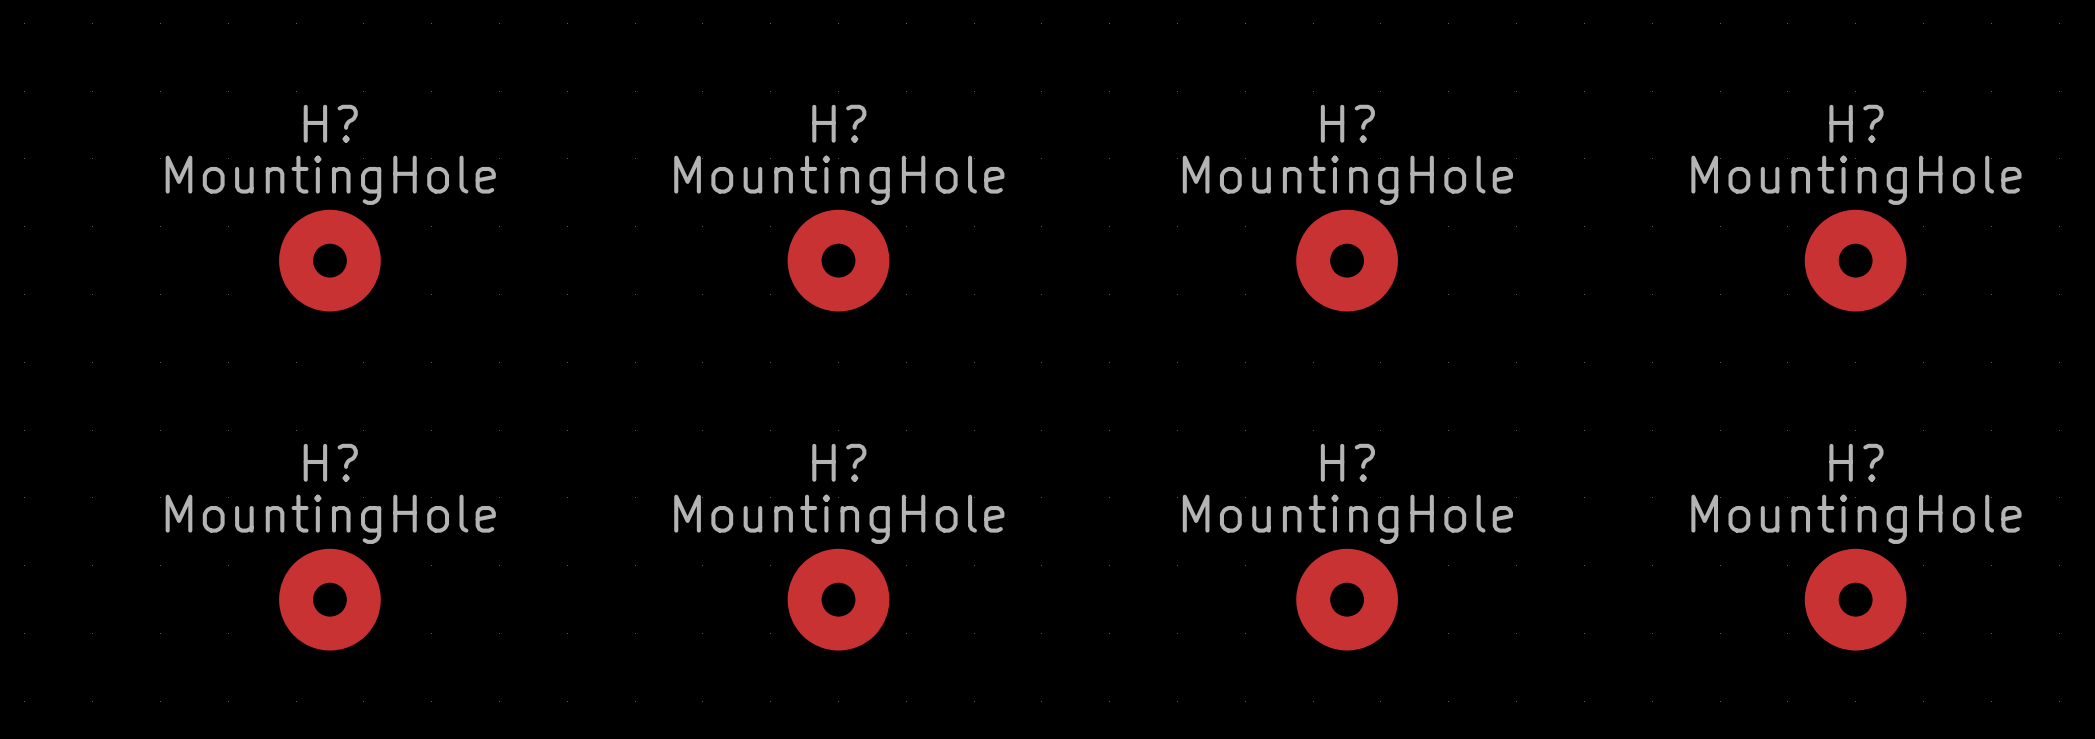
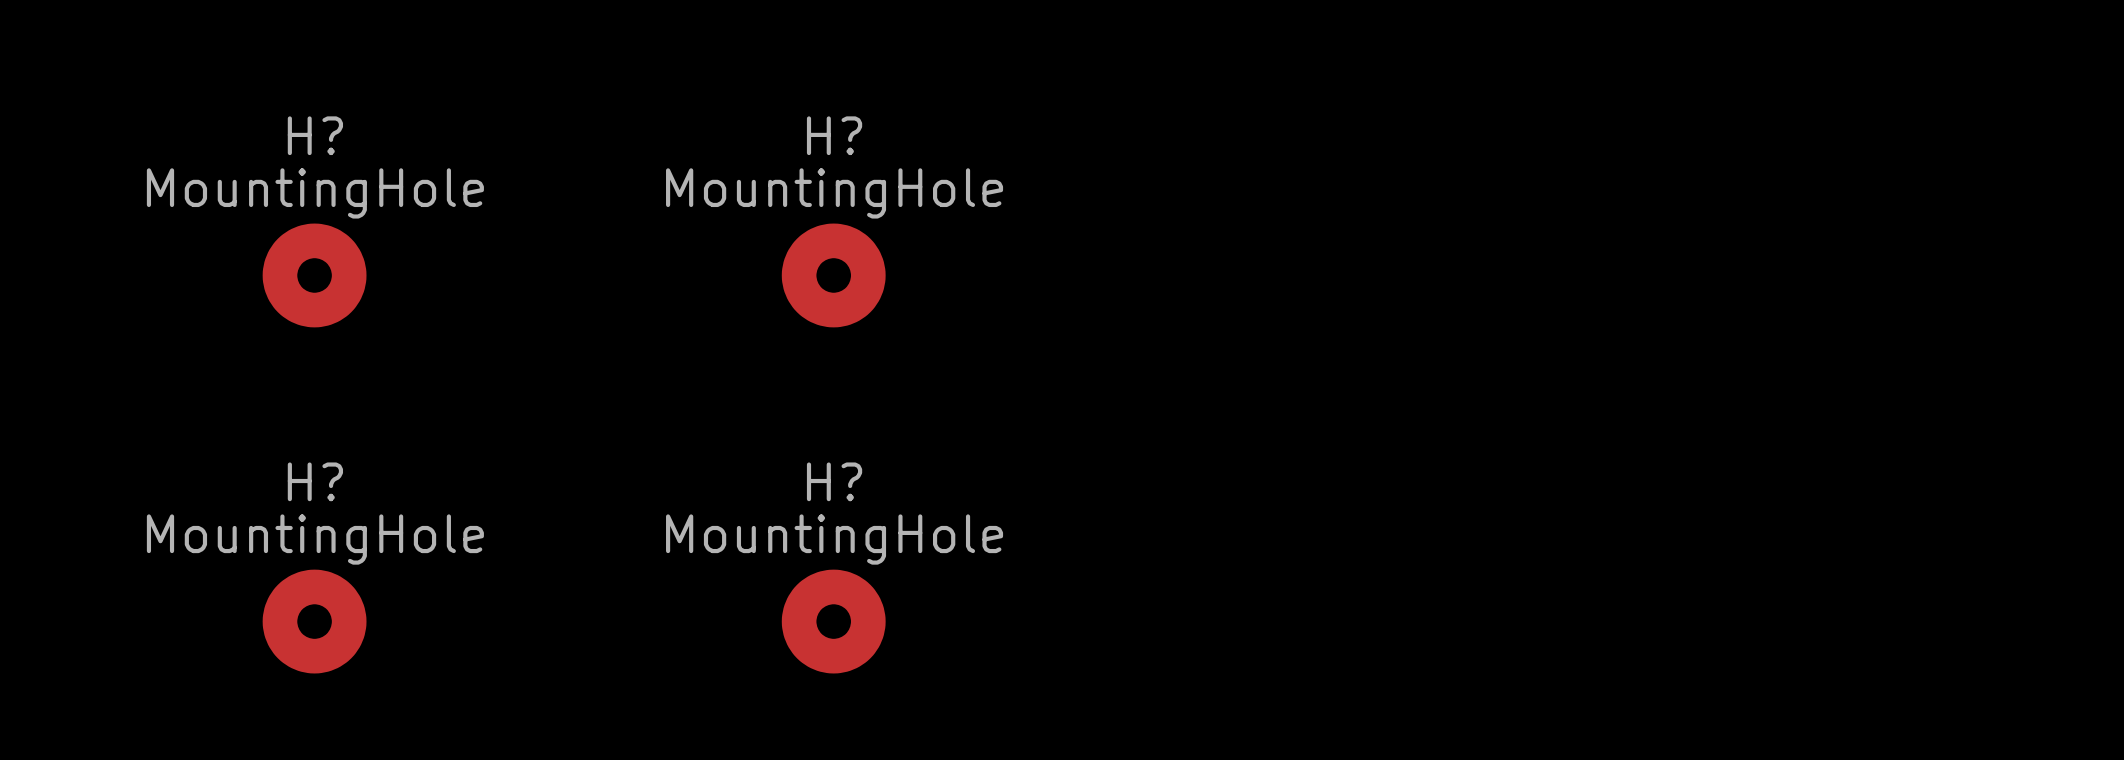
H?: MountingHole (1347, 260) -> none
H?: MountingHole (1855, 260) -> none
H?: MountingHole (1347, 599) -> none
H?: MountingHole (1855, 599) -> none

